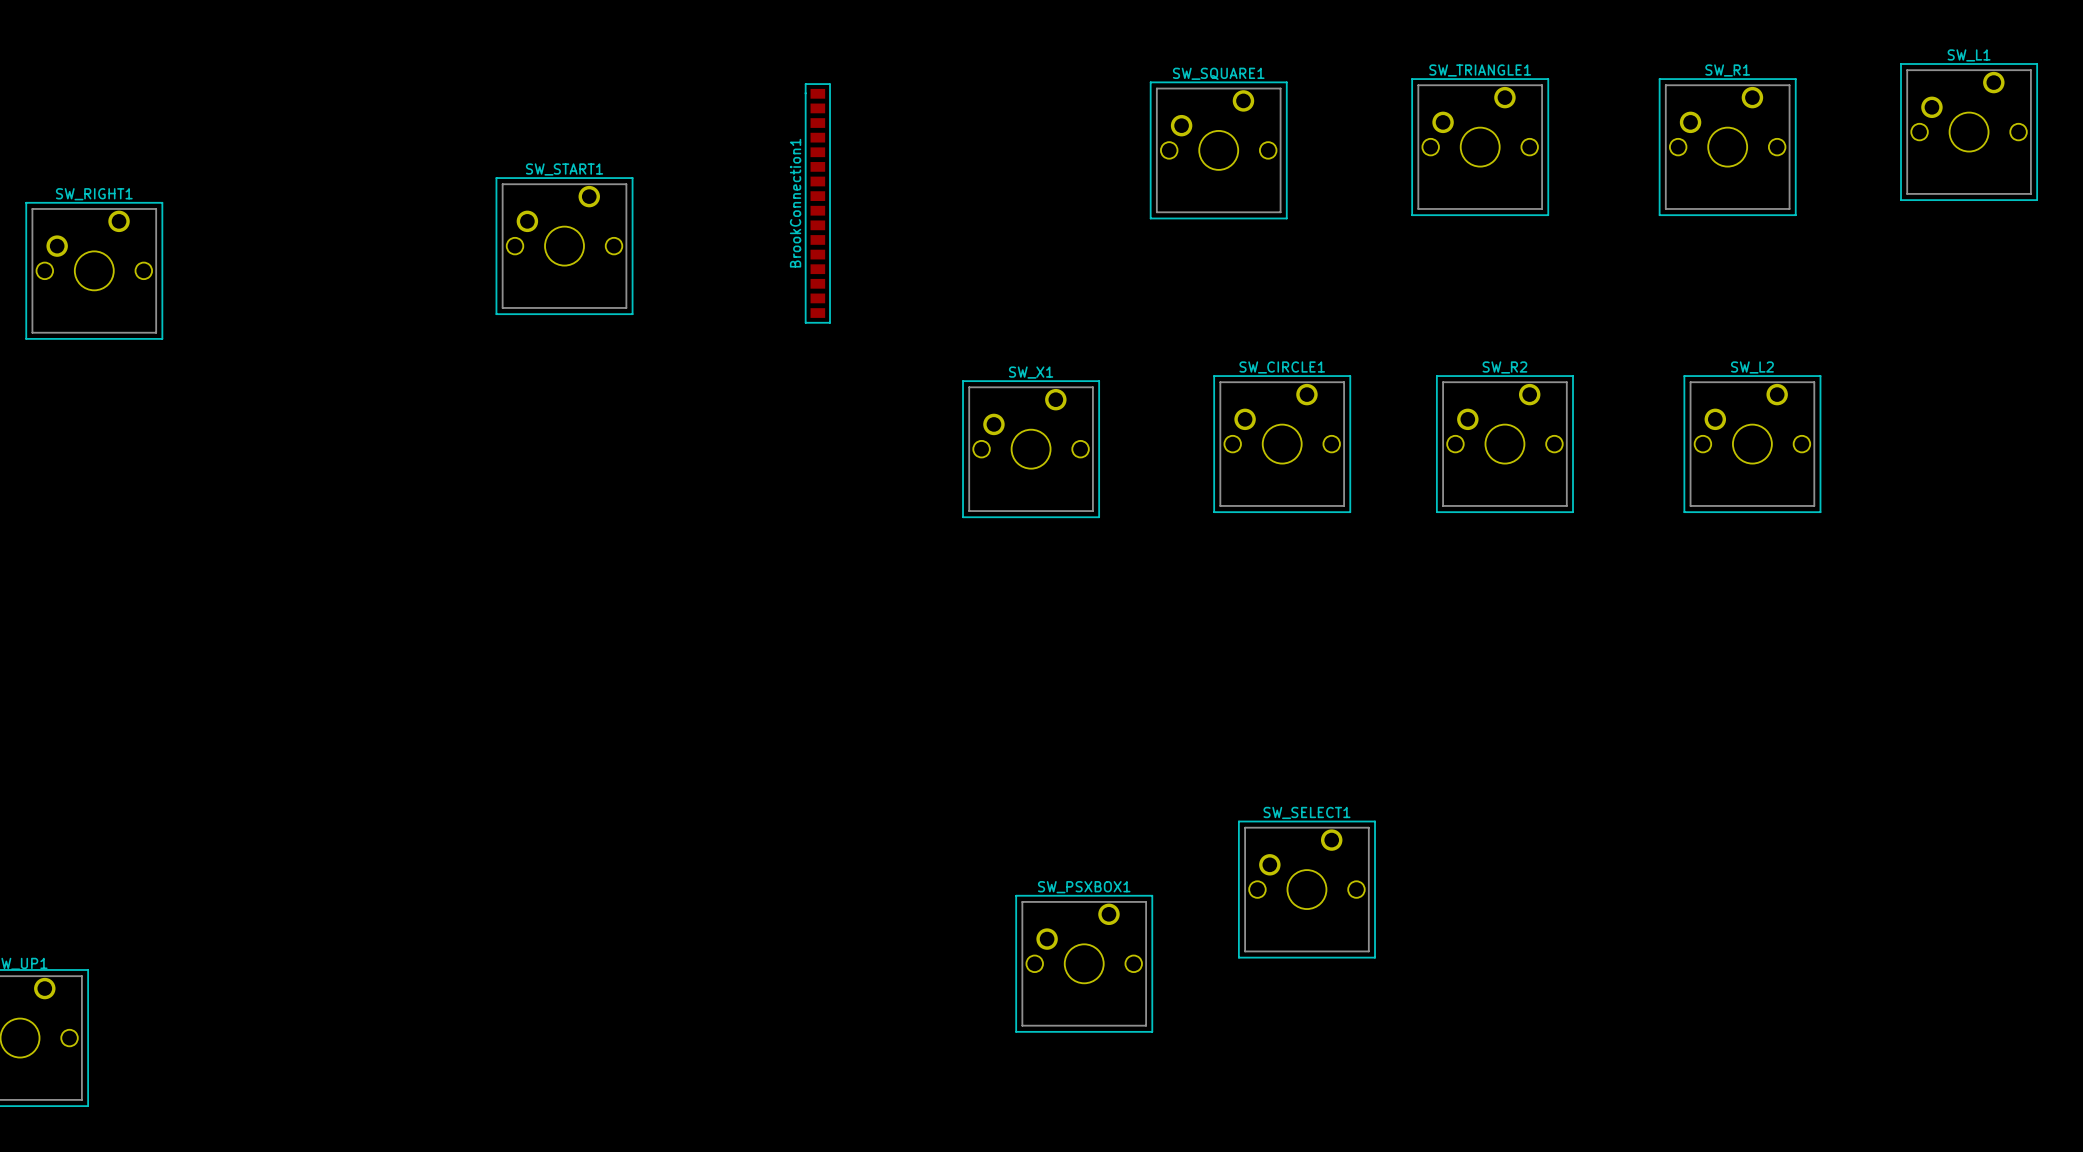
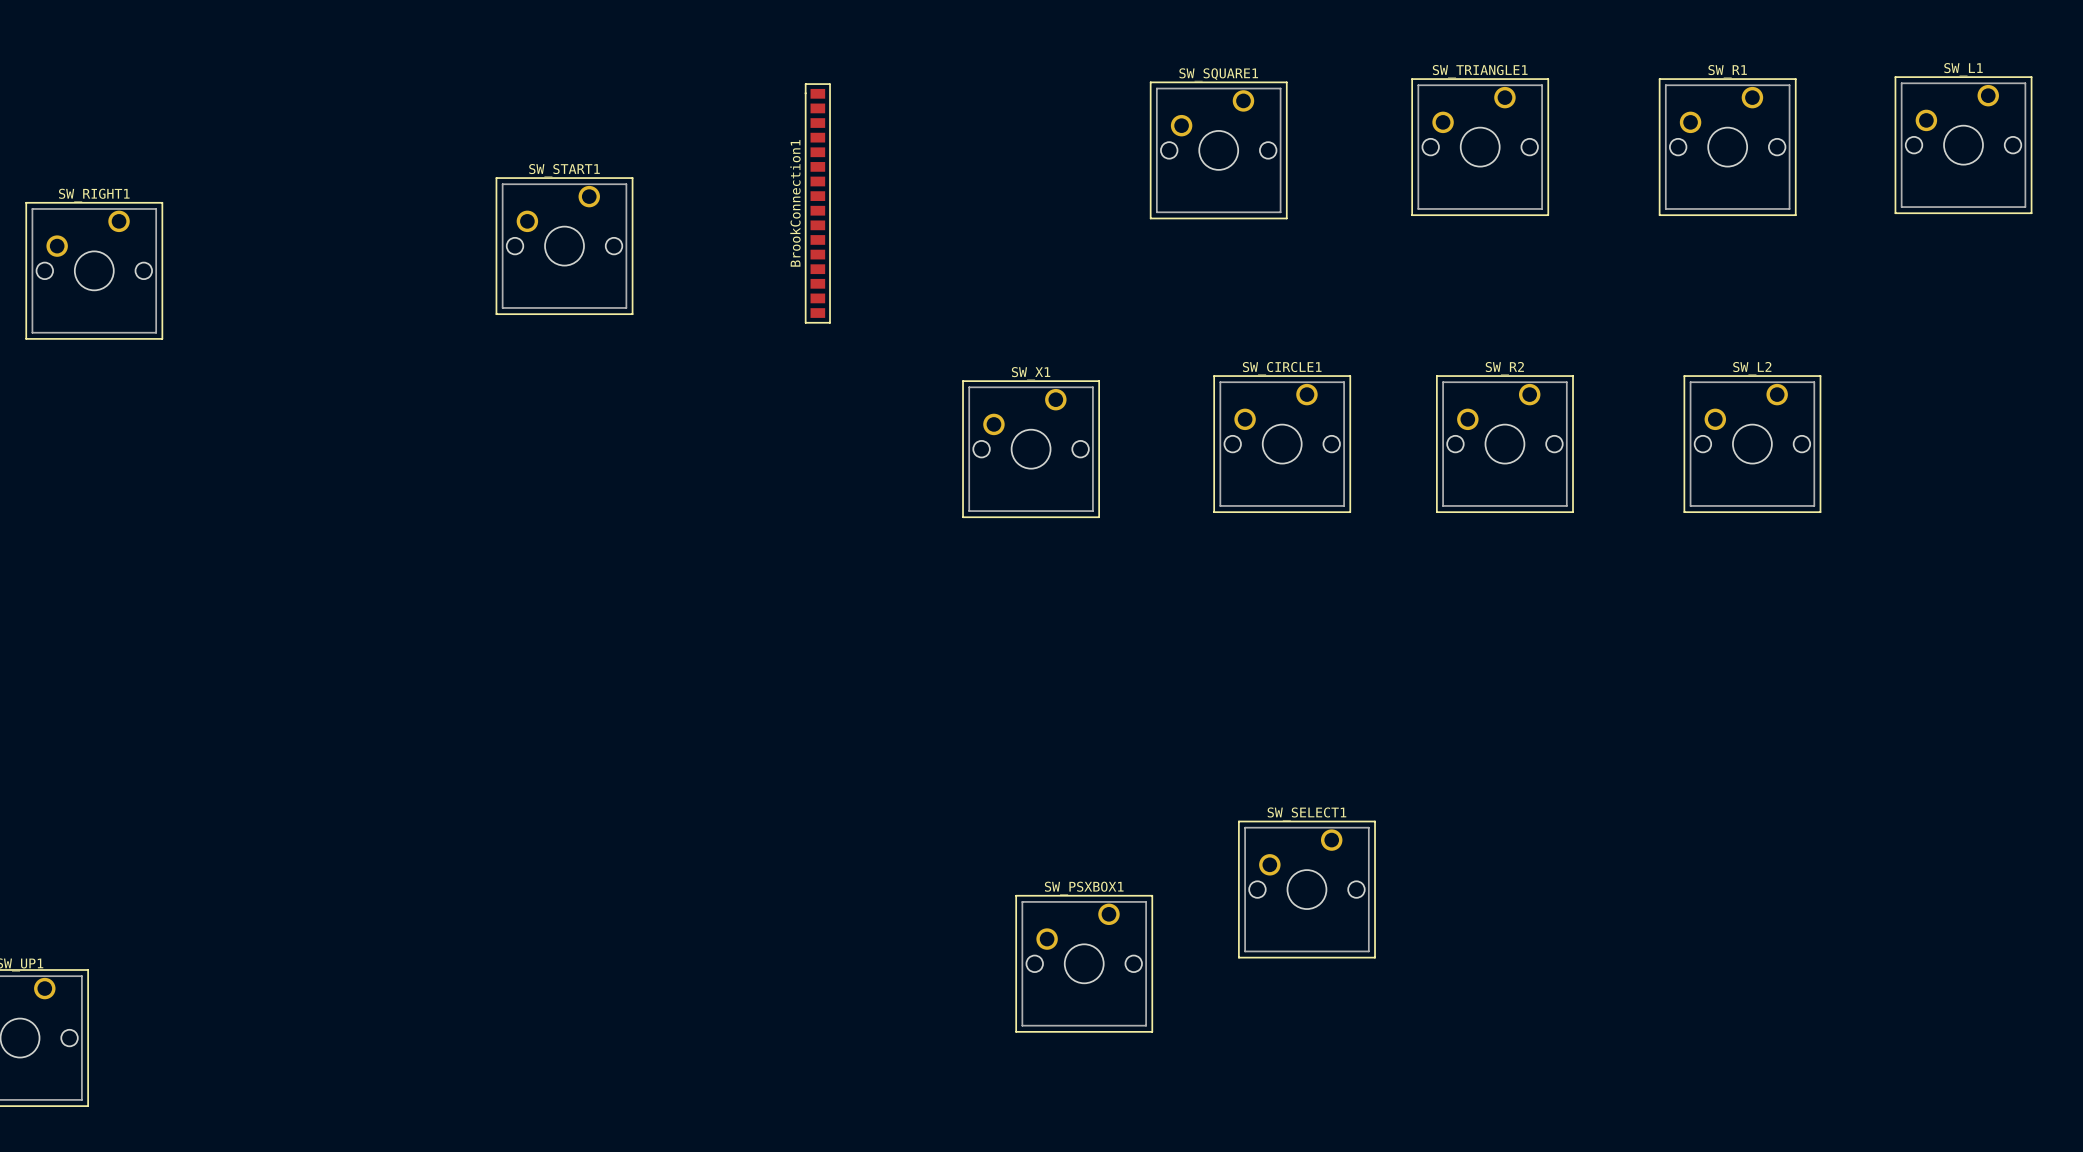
SW_L1 position: (1969, 132) -> (1963, 145)

